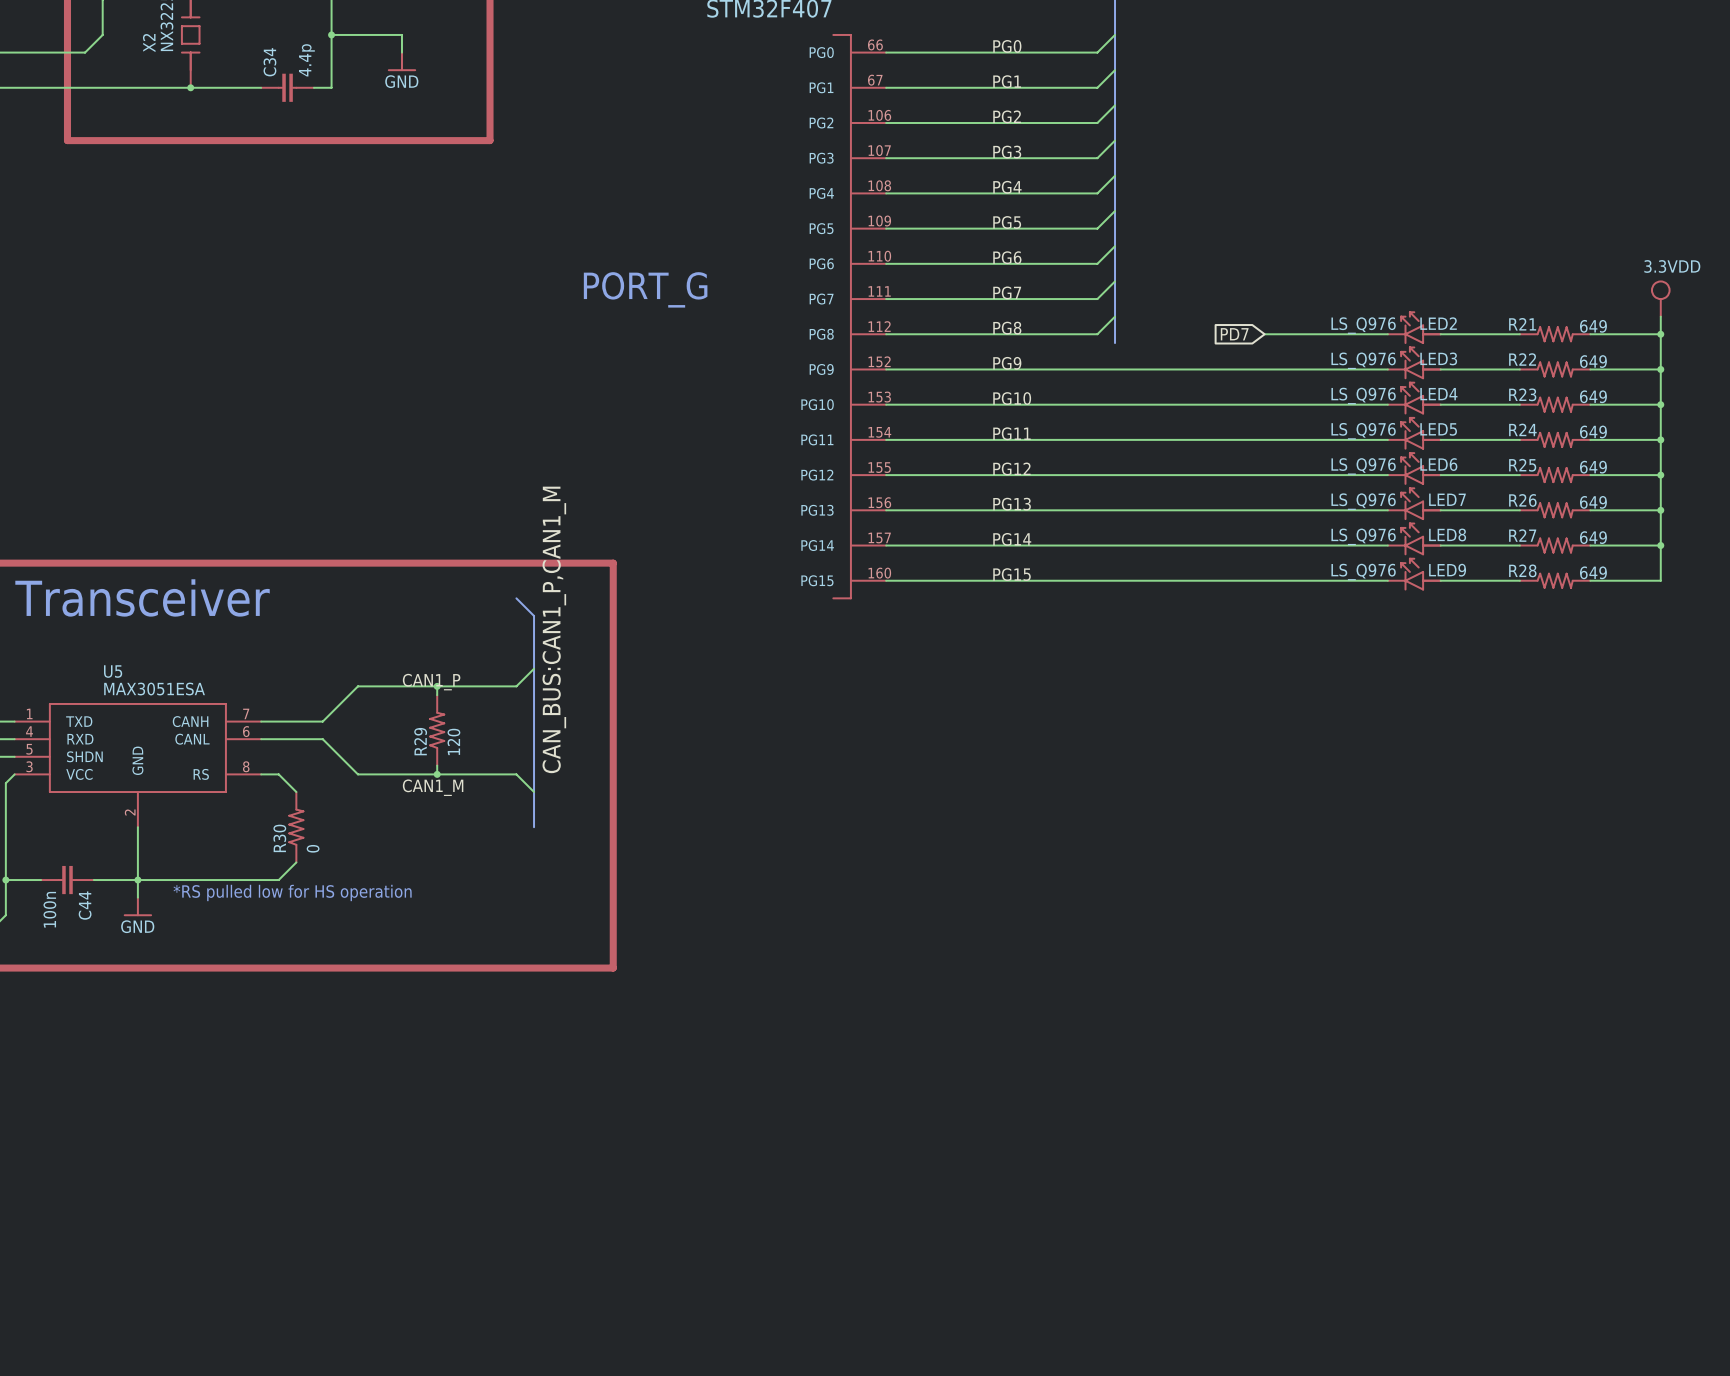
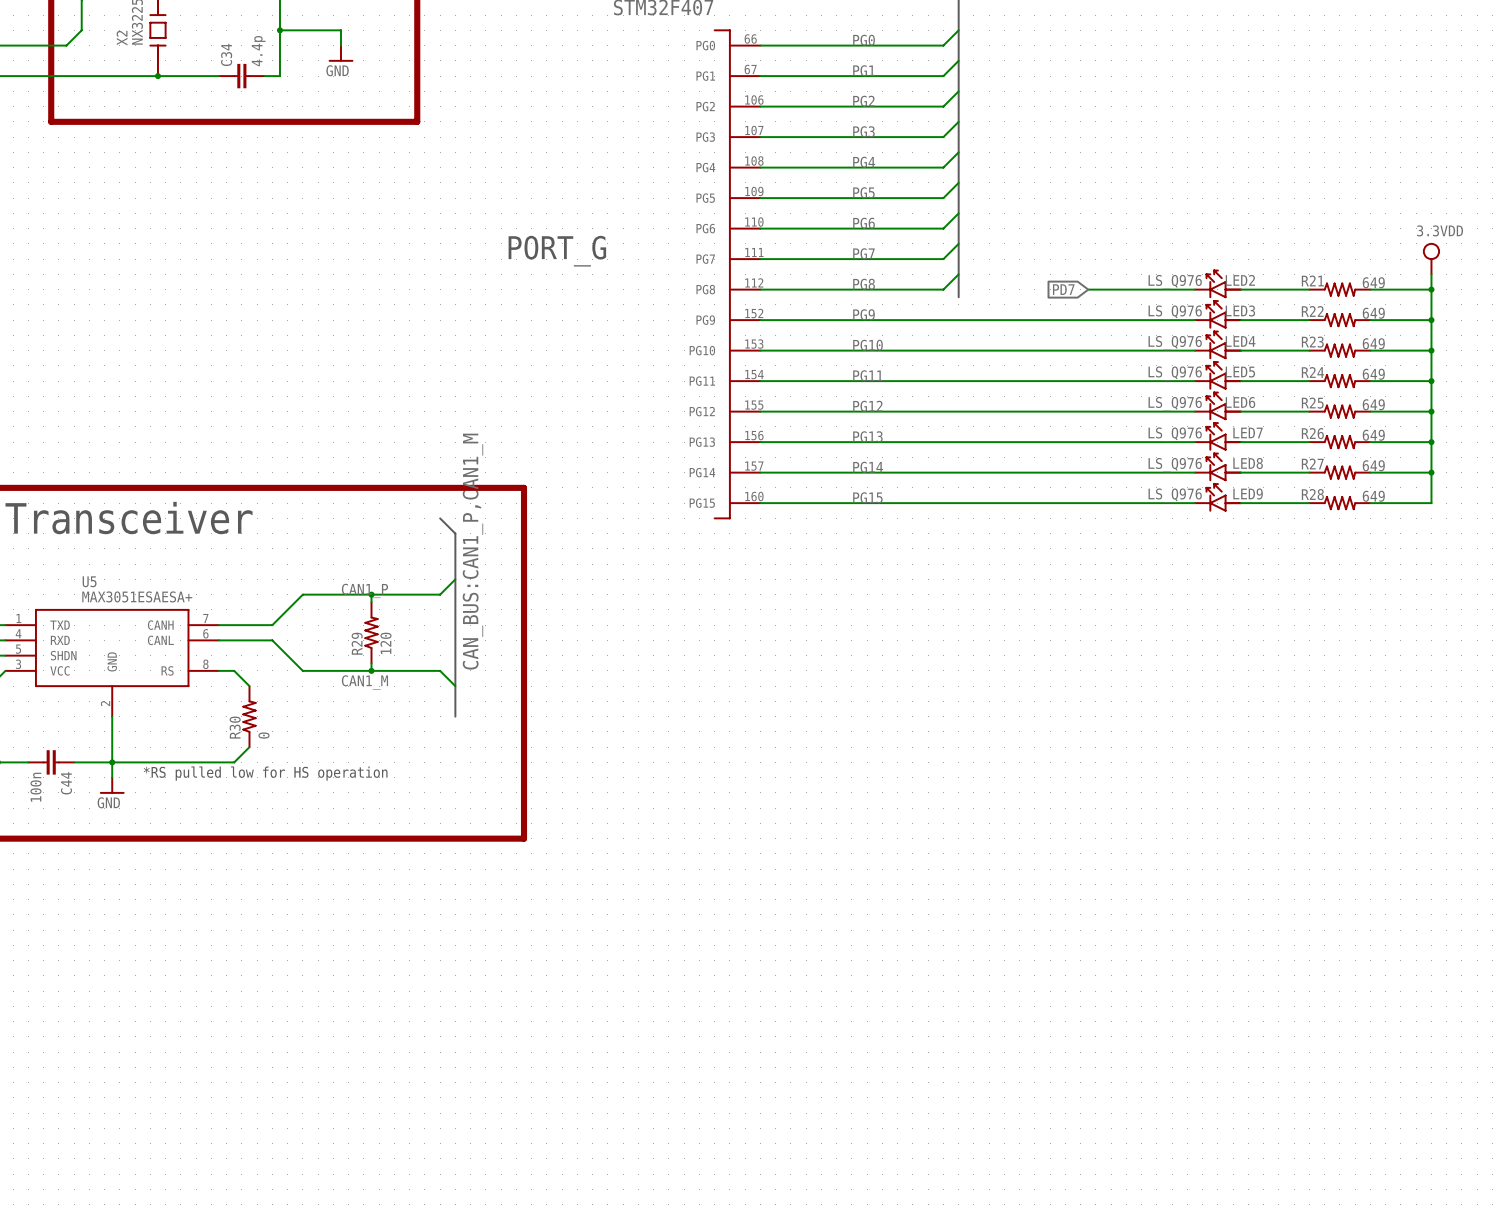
U5 value: MAX3051ESA (154, 689) -> MAX3051ESAESA+ (137, 596)

